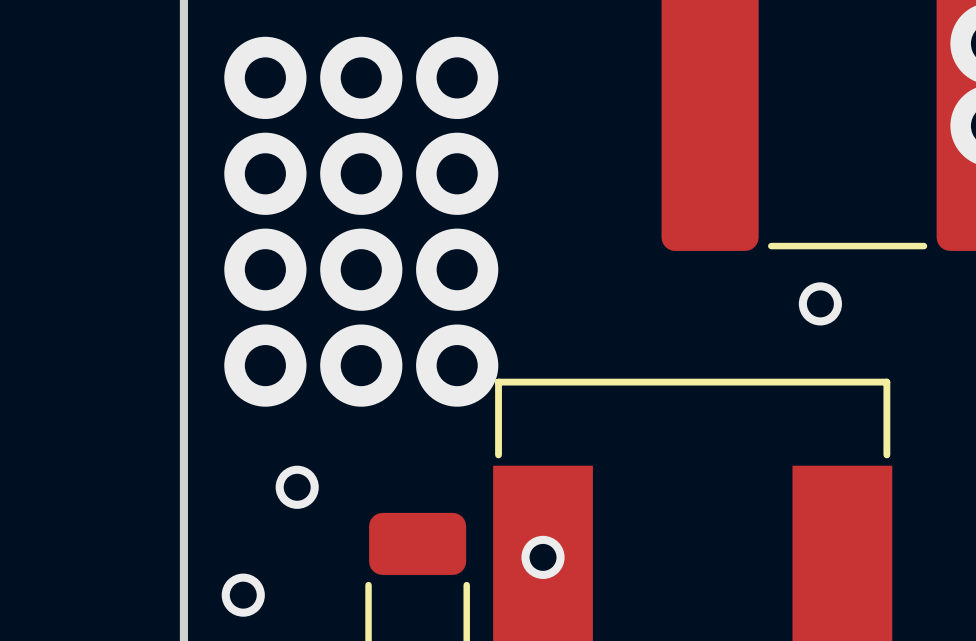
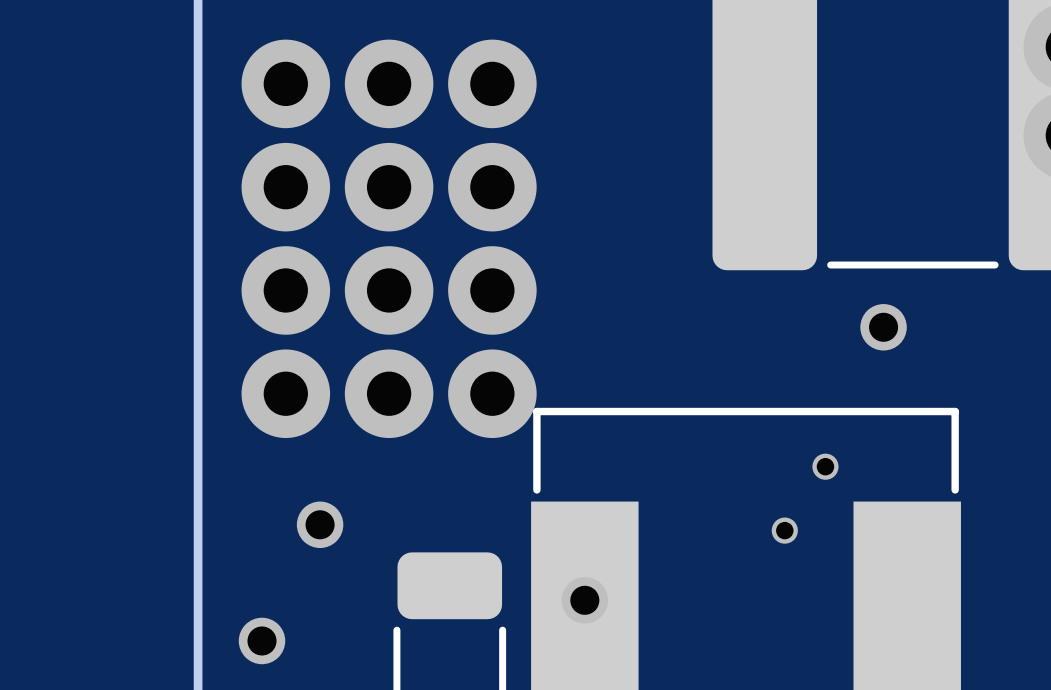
via: none -> (825, 466)
via: none -> (784, 530)

